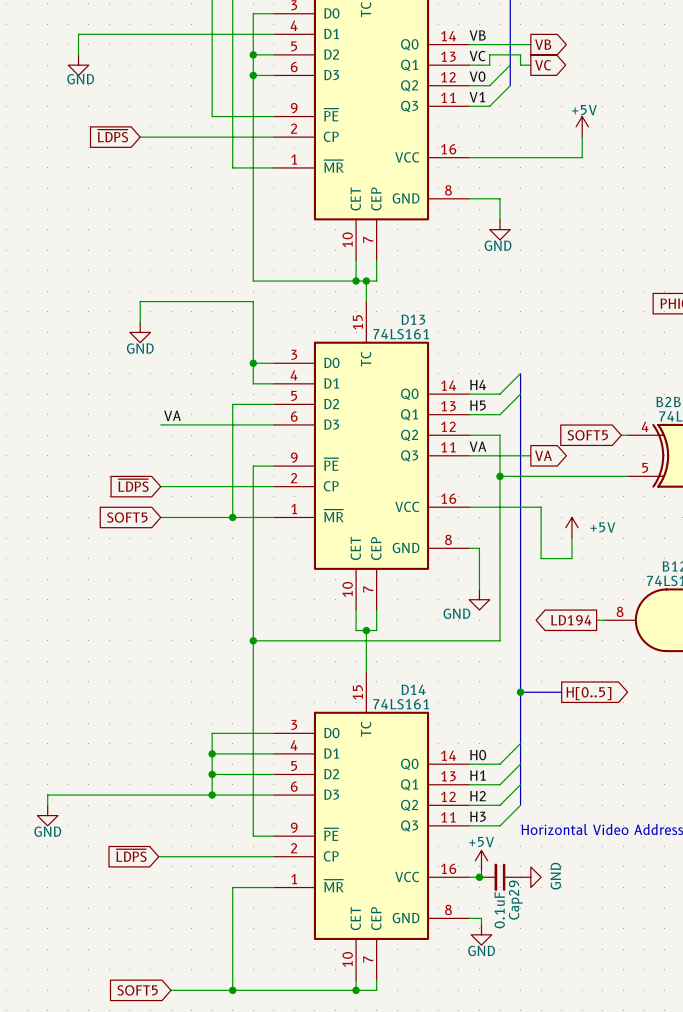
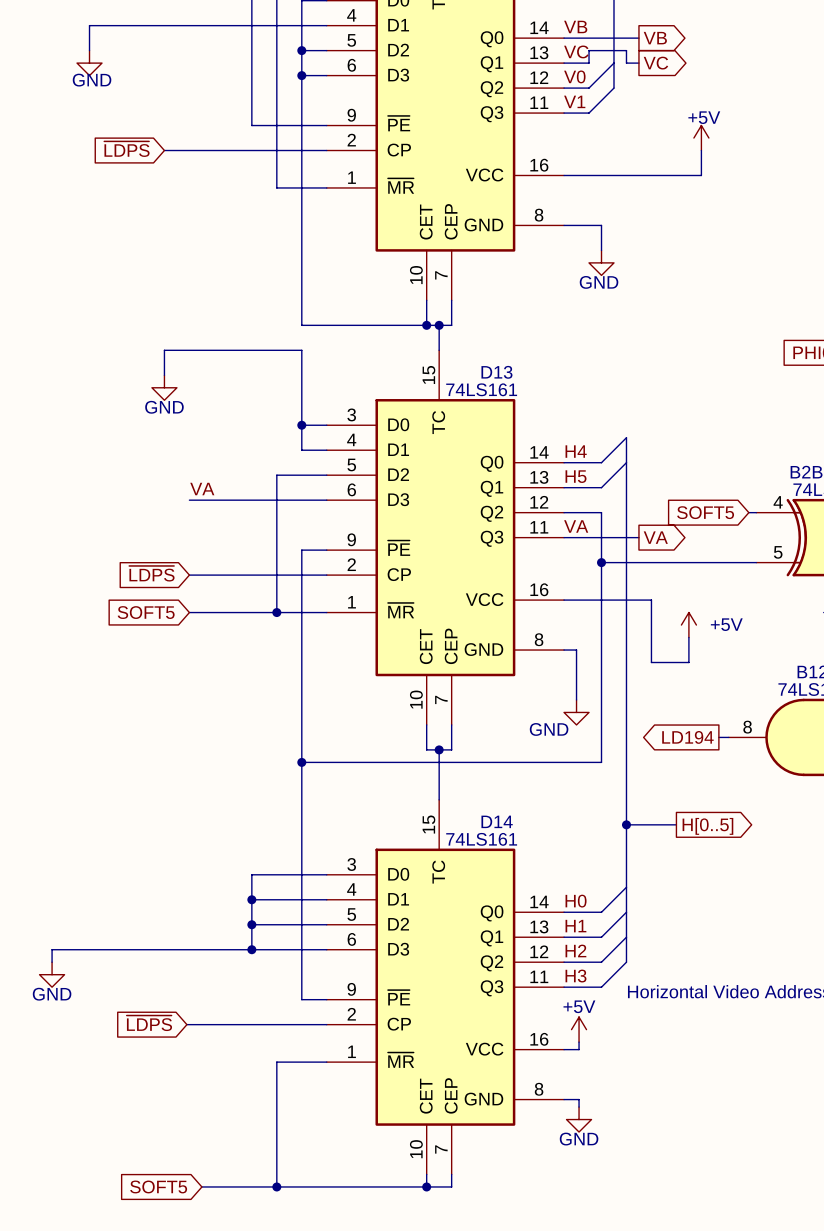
junction: (479, 877) -> none
Cap29: 0.1uF (500, 877) -> none
power symbol: GND (530, 877) -> none

